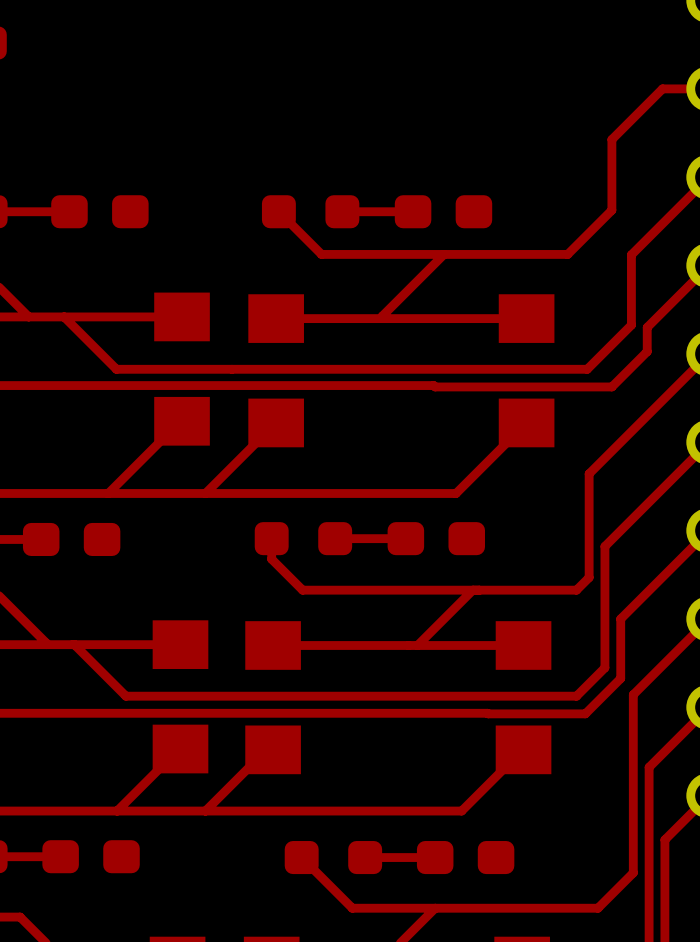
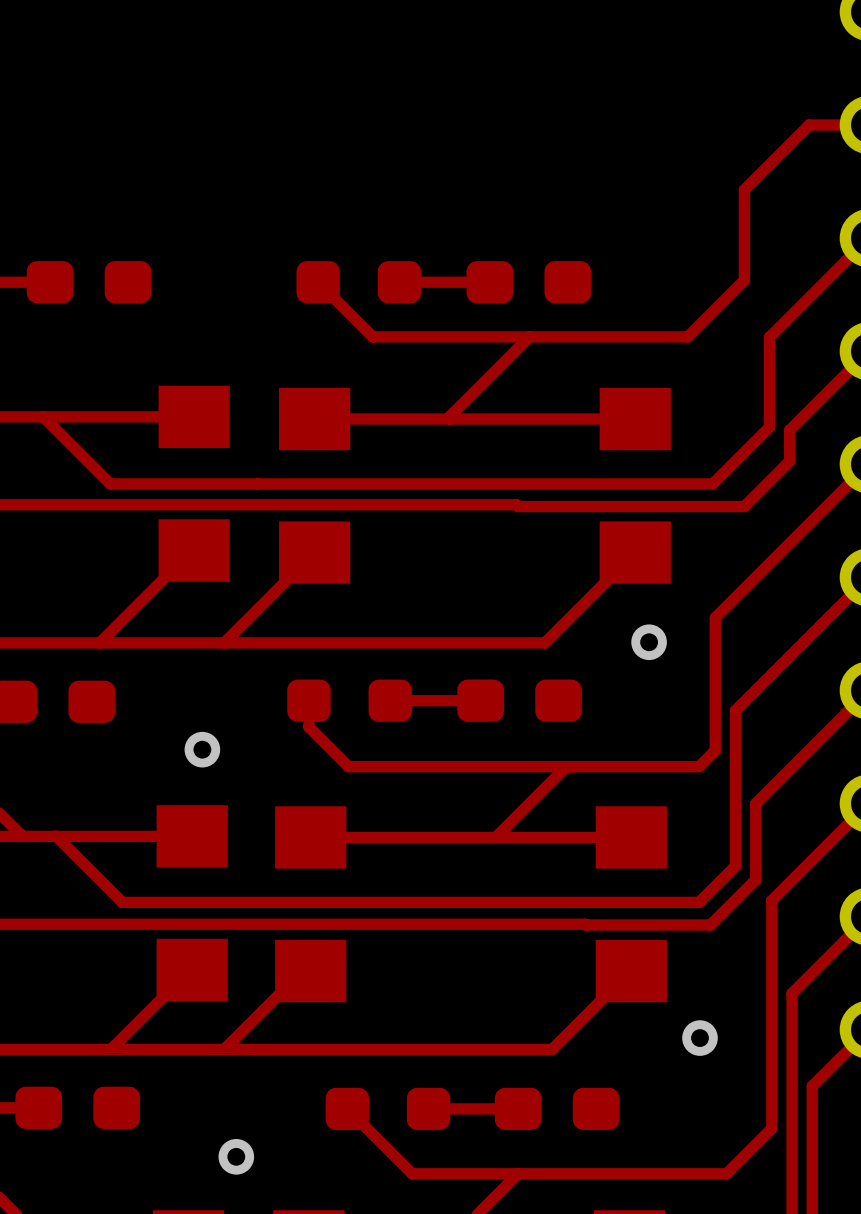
via: none -> (649, 642)
via: none -> (202, 749)
via: none -> (699, 1038)
via: none -> (236, 1156)

